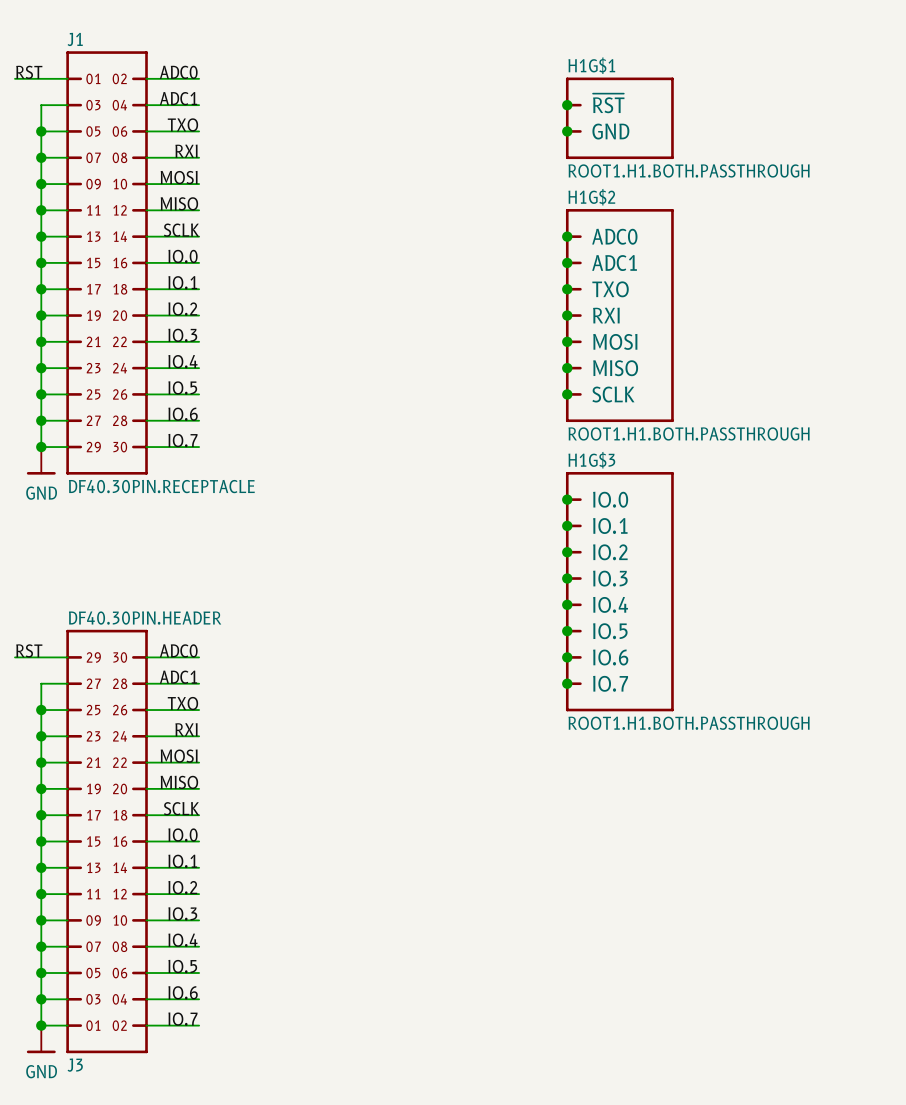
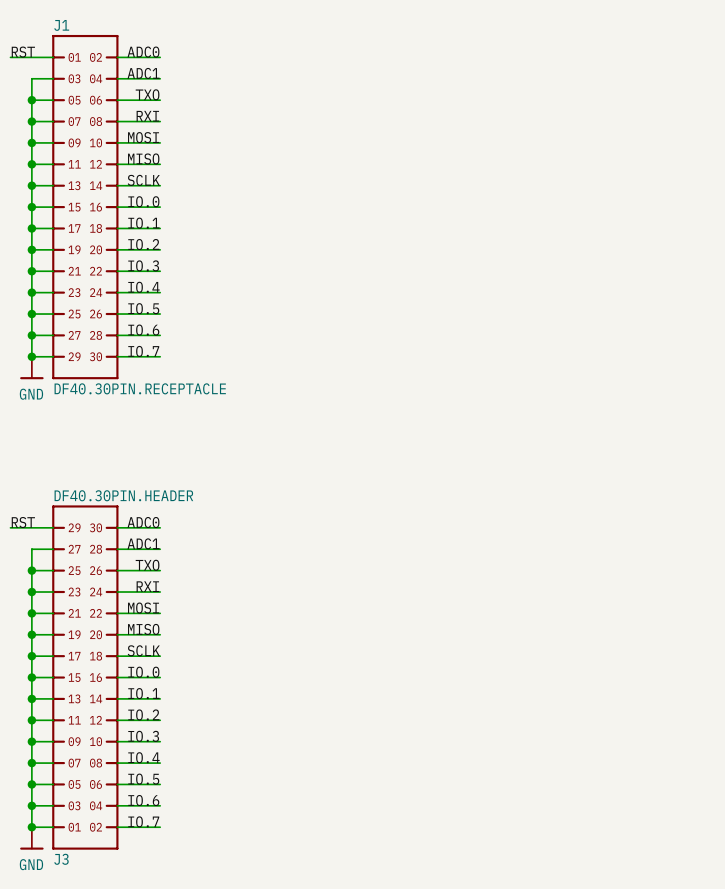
junction: (567, 105) -> none
H1G$1: ROOT1.H1.BOTH.PASSTHROUGH (619, 118) -> none
junction: (567, 131) -> none
junction: (567, 236) -> none
junction: (567, 262) -> none
junction: (567, 289) -> none
junction: (567, 315) -> none
H1G$2: ROOT1.H1.BOTH.PASSTHROUGH (619, 315) -> none
junction: (567, 341) -> none
junction: (567, 368) -> none
junction: (567, 394) -> none
junction: (567, 499) -> none
junction: (567, 525) -> none
junction: (567, 552) -> none
junction: (567, 578) -> none
H1G$3: ROOT1.H1.BOTH.PASSTHROUGH (619, 591) -> none
junction: (567, 604) -> none
junction: (567, 631) -> none
junction: (567, 657) -> none
junction: (567, 683) -> none

